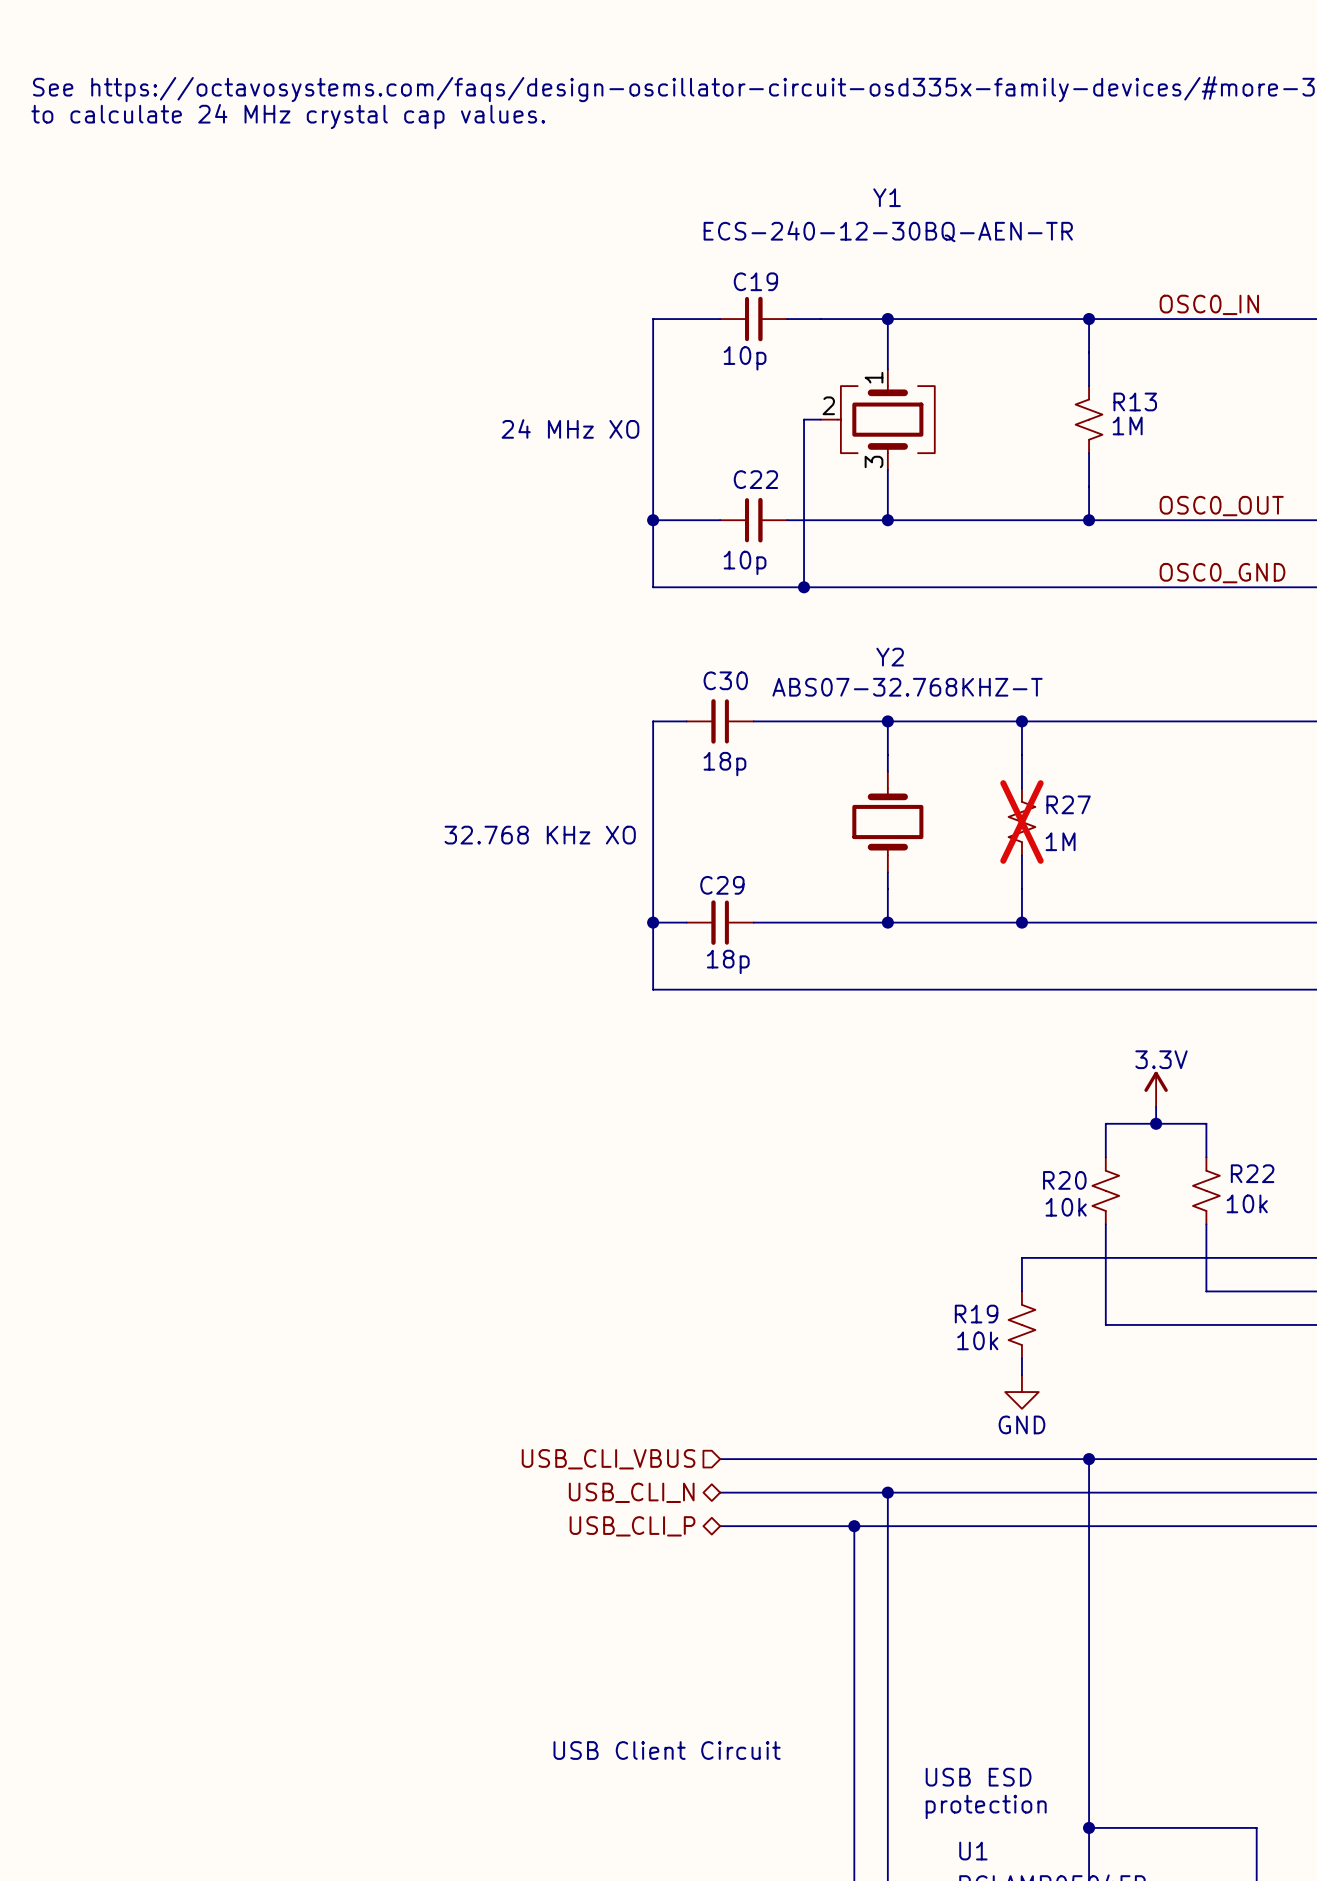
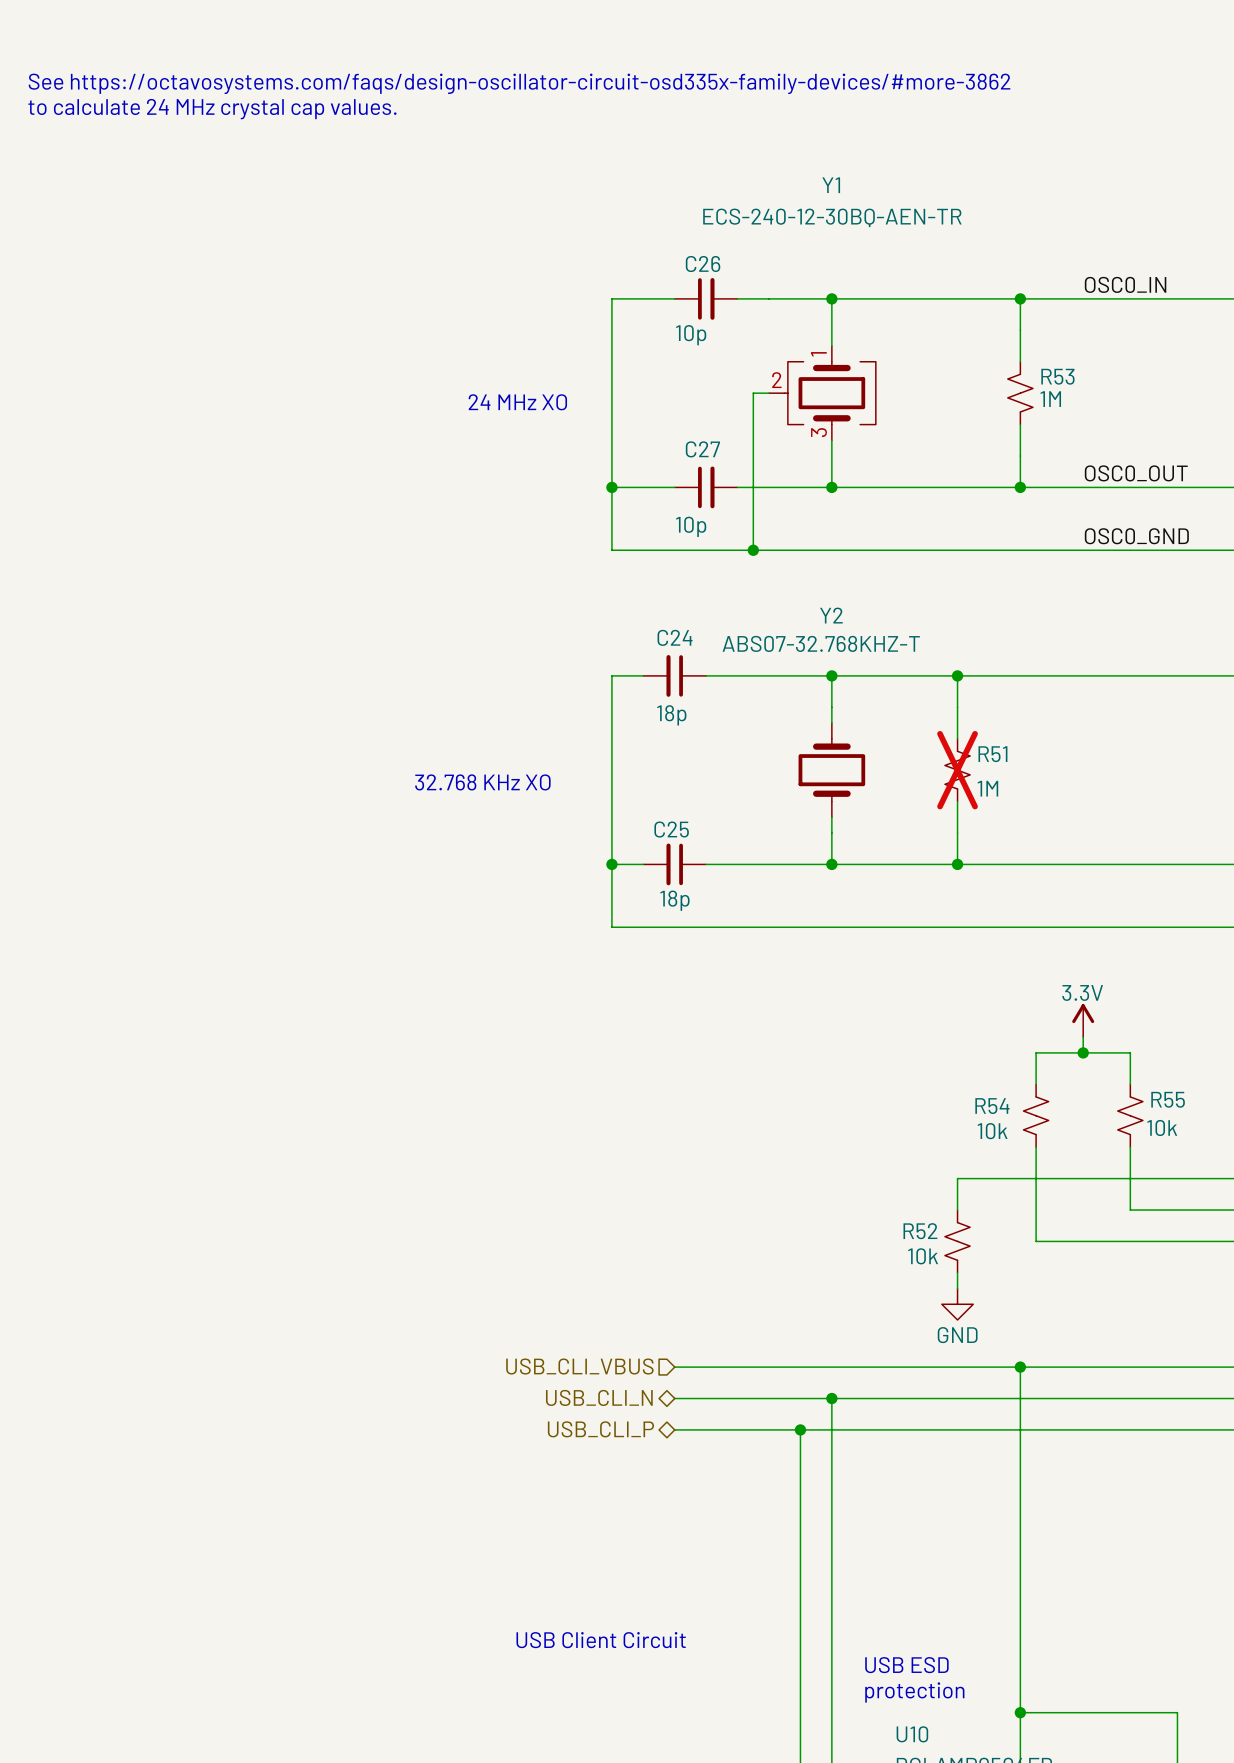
C19 name: C19 (755, 281) -> C26 (703, 264)
R13 name: R13 (1135, 401) -> R53 (1057, 376)
C22 name: C22 (755, 479) -> C27 (702, 449)
C30 name: C30 (725, 680) -> C24 (675, 637)
R27 name: R27 (1068, 804) -> R51 (992, 754)
C29 name: C29 (722, 885) -> C25 (671, 829)
R22 name: R22 (1252, 1173) -> R55 (1168, 1099)
R20 name: R20 (1064, 1180) -> R54 (992, 1106)
R19 name: R19 (976, 1314) -> R52 (920, 1231)
U1 name: U1 (973, 1851) -> U10 (912, 1734)

